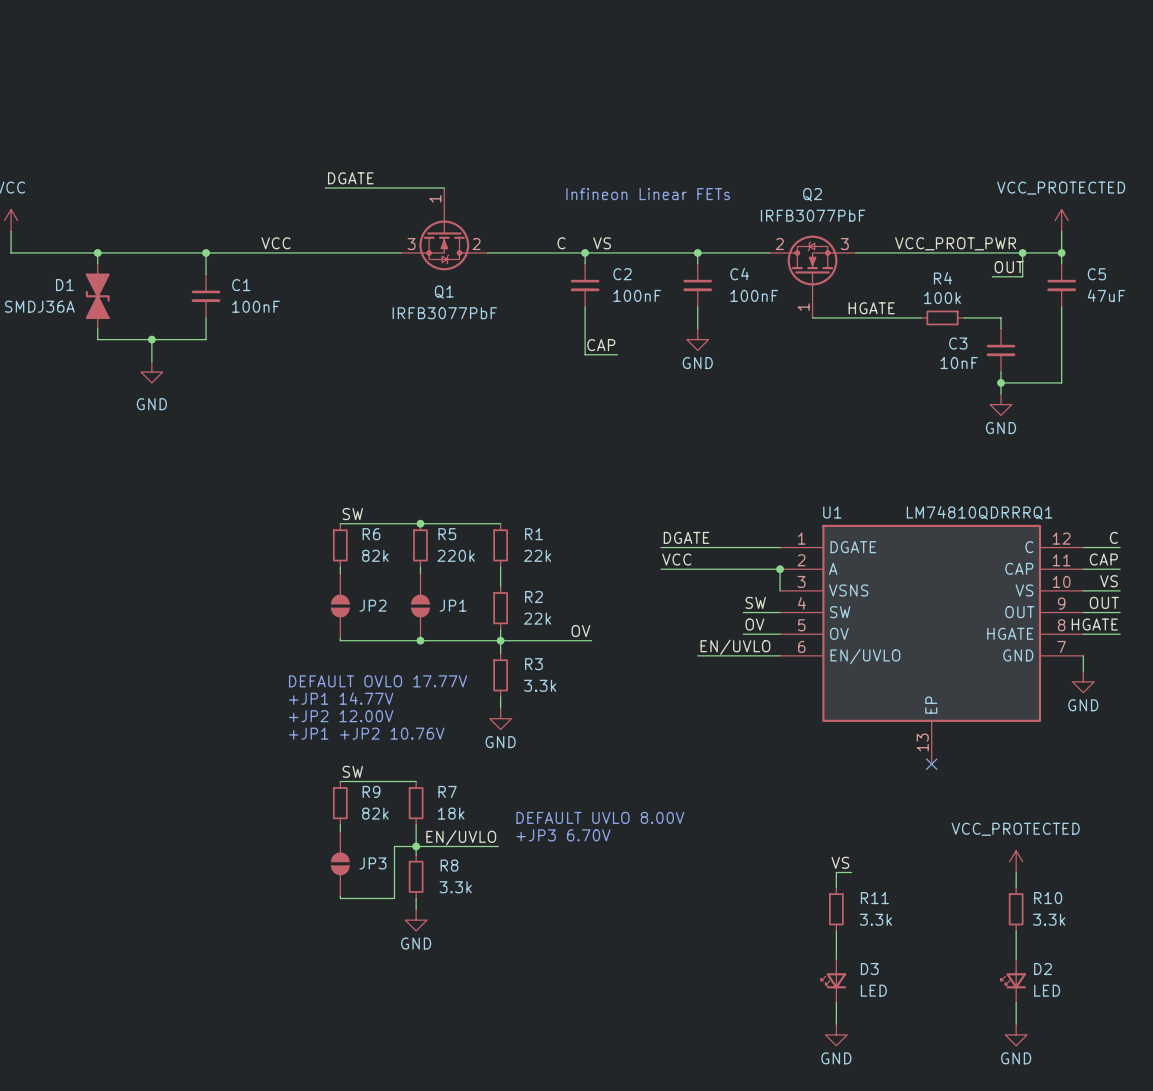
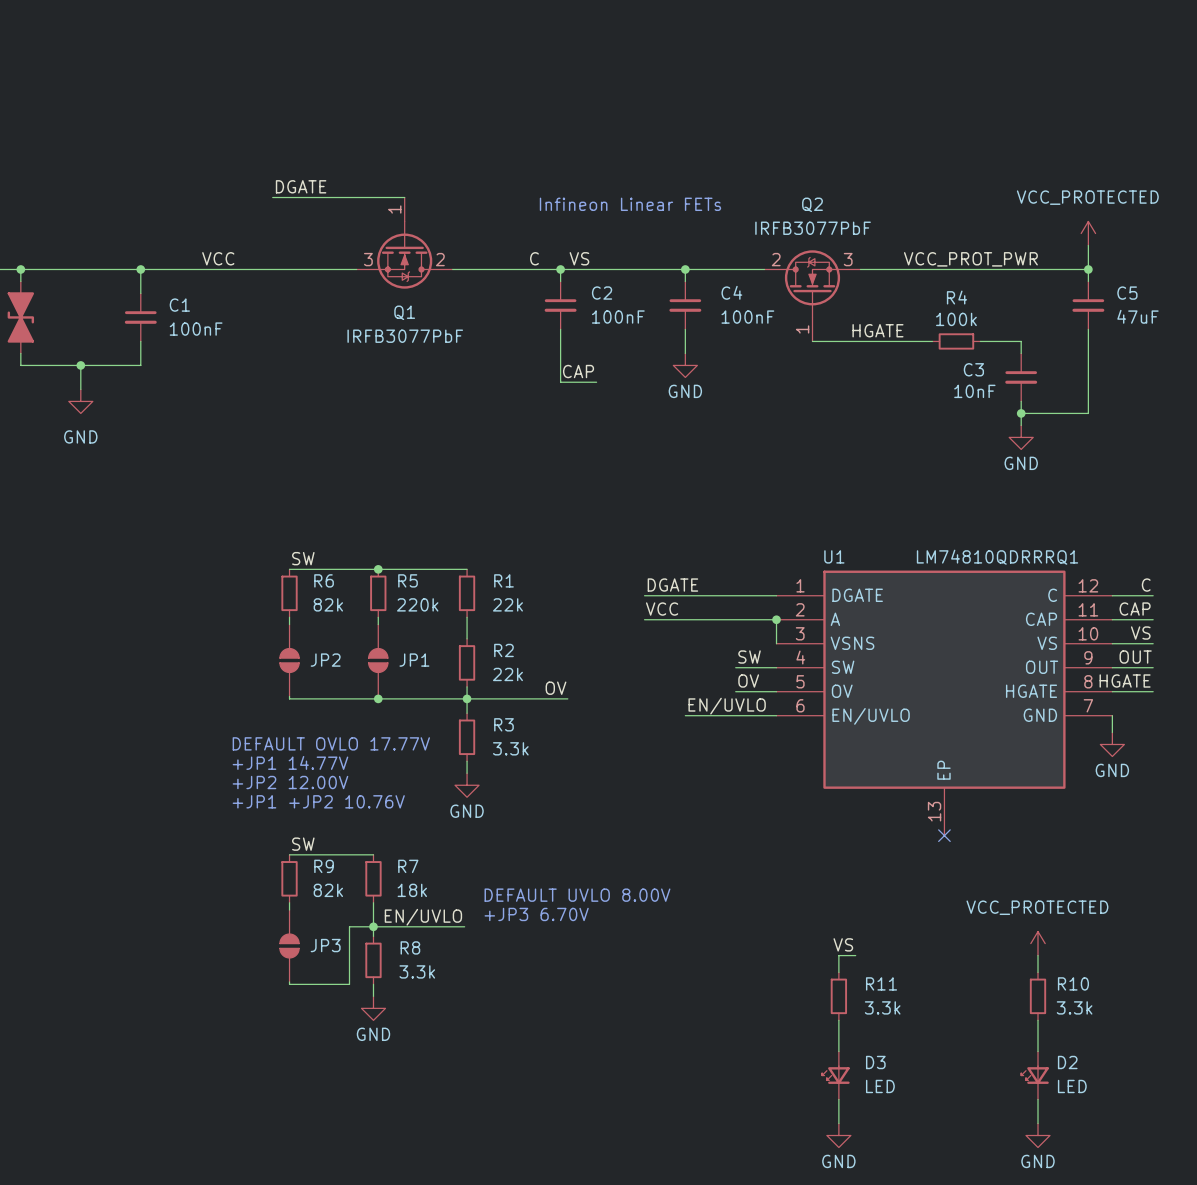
wire: (1022, 252) (1022, 276) (992, 276) -> none
junction: (1022, 252) -> none
label: OUT (1009, 267) -> none

